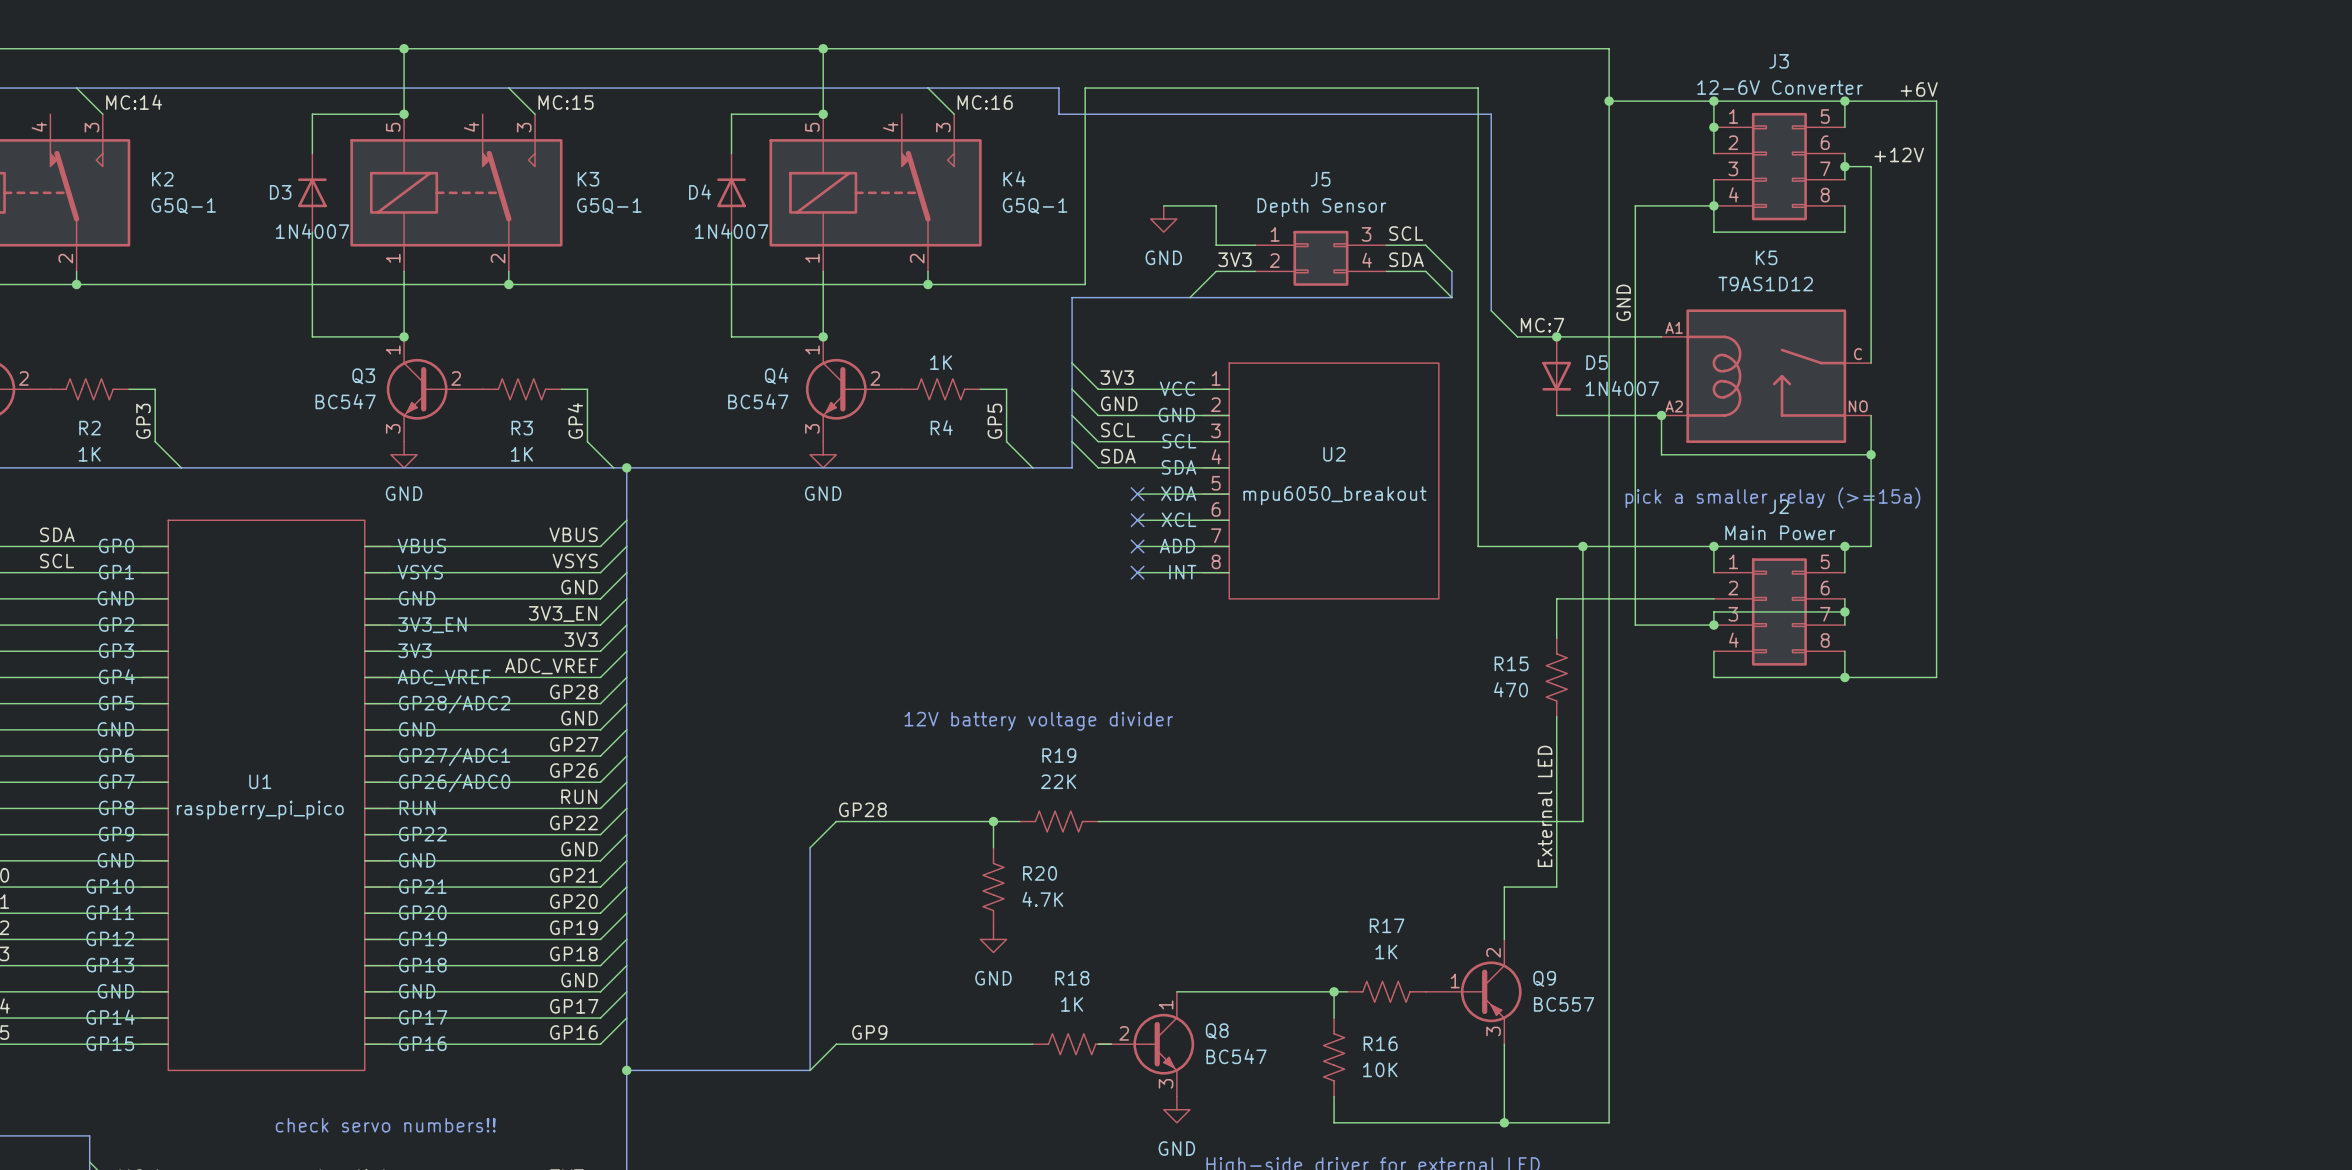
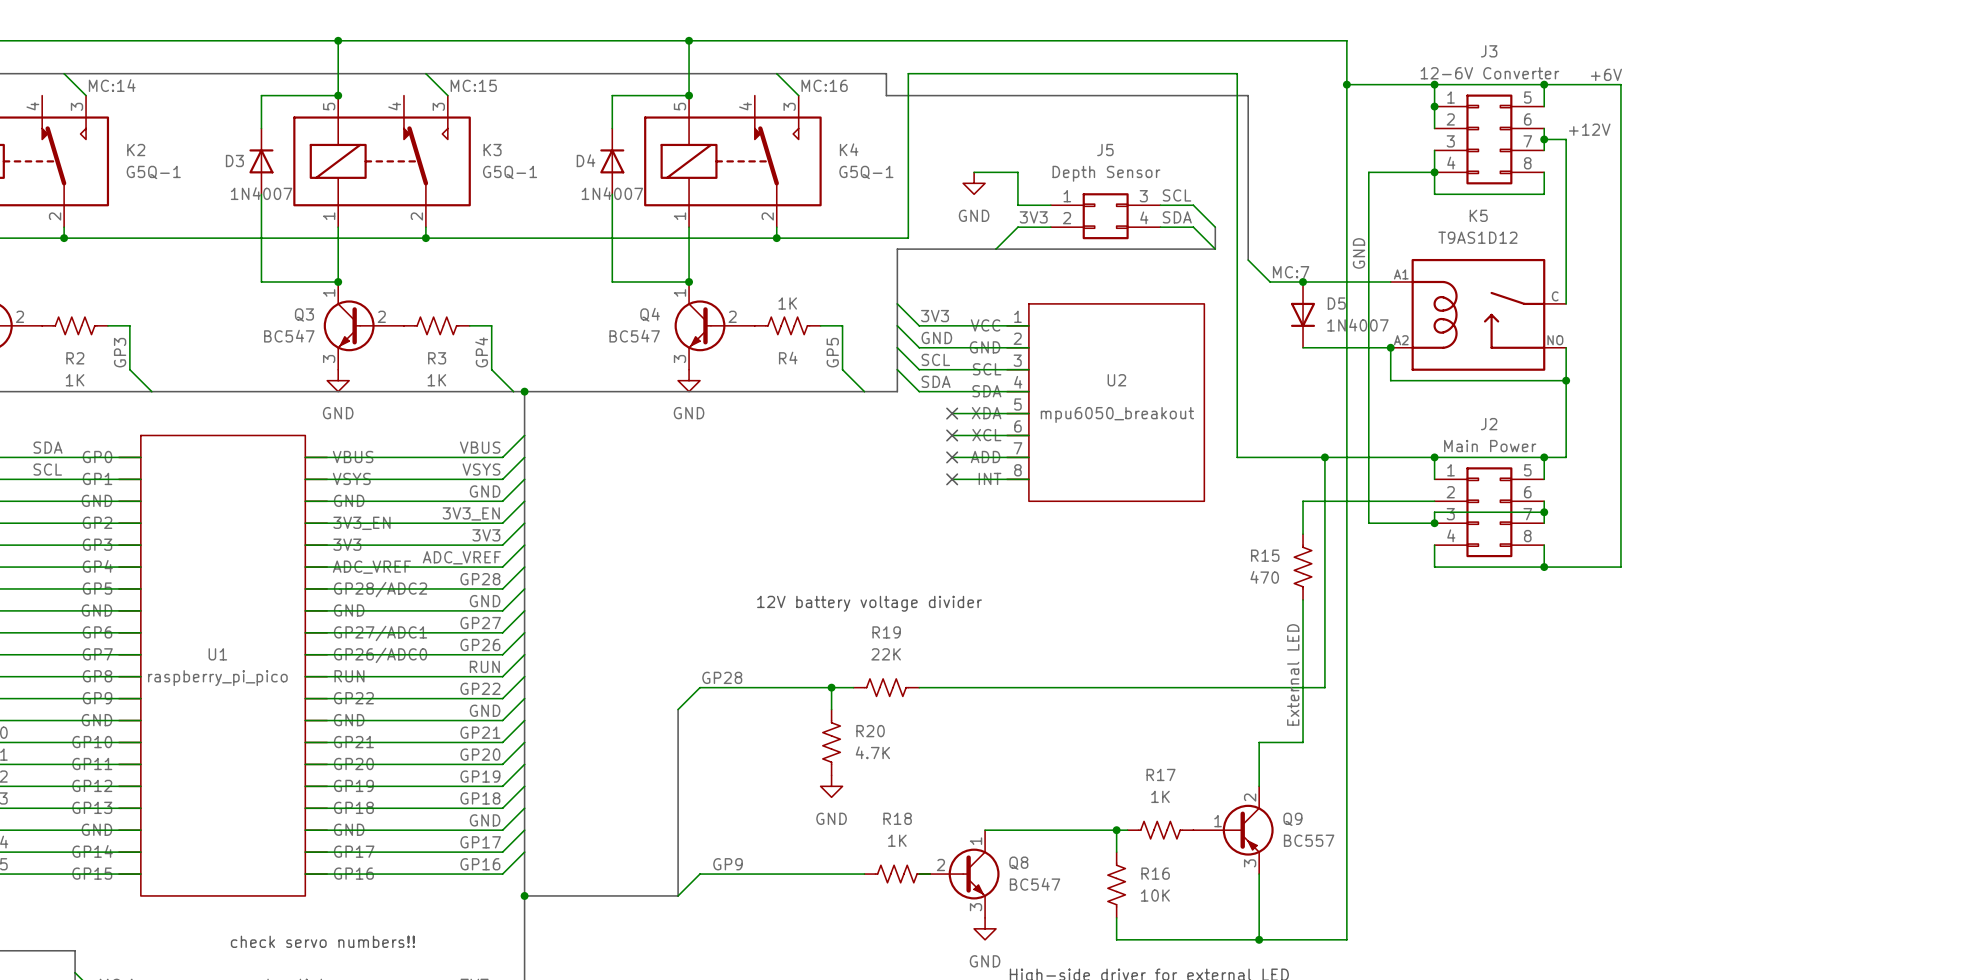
text: pick a smaller relay (>=15a) (1772, 498) -> none

